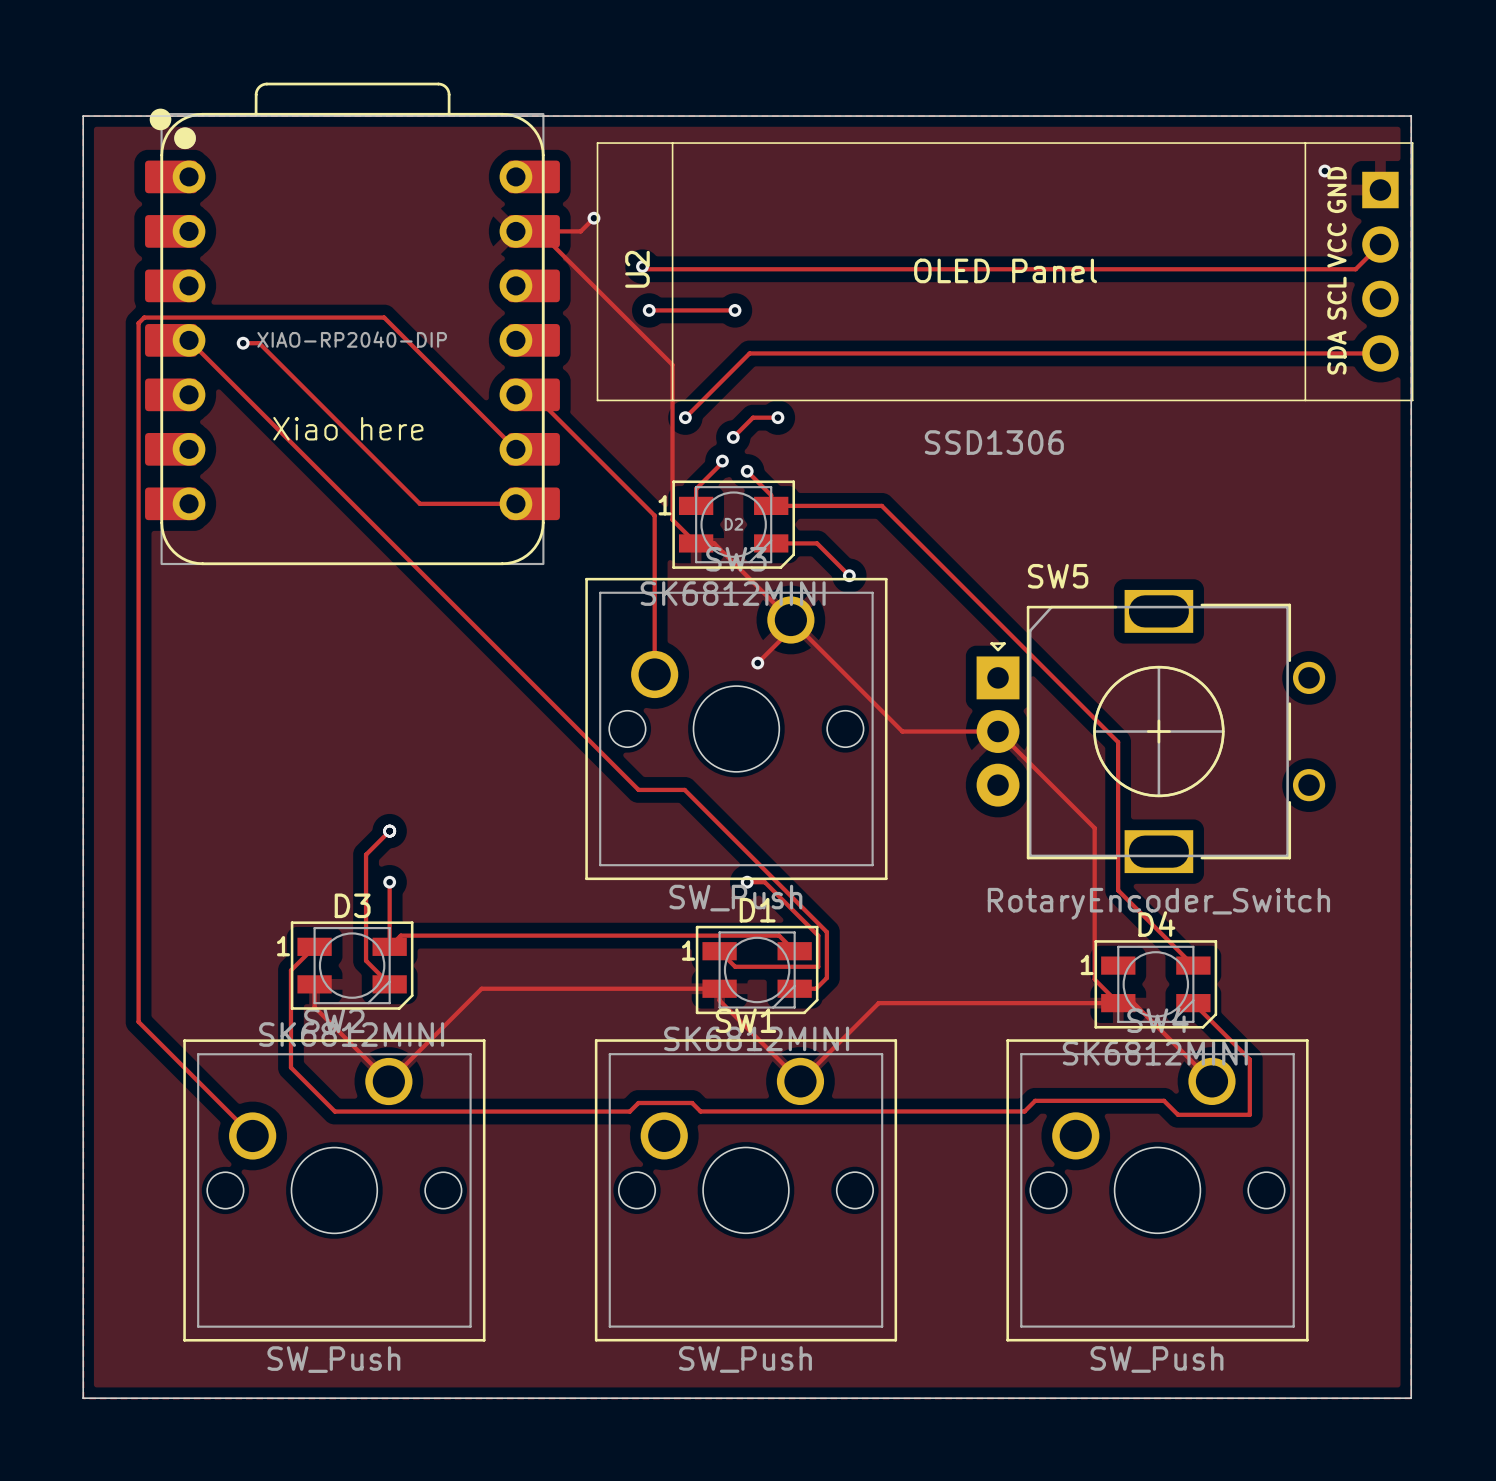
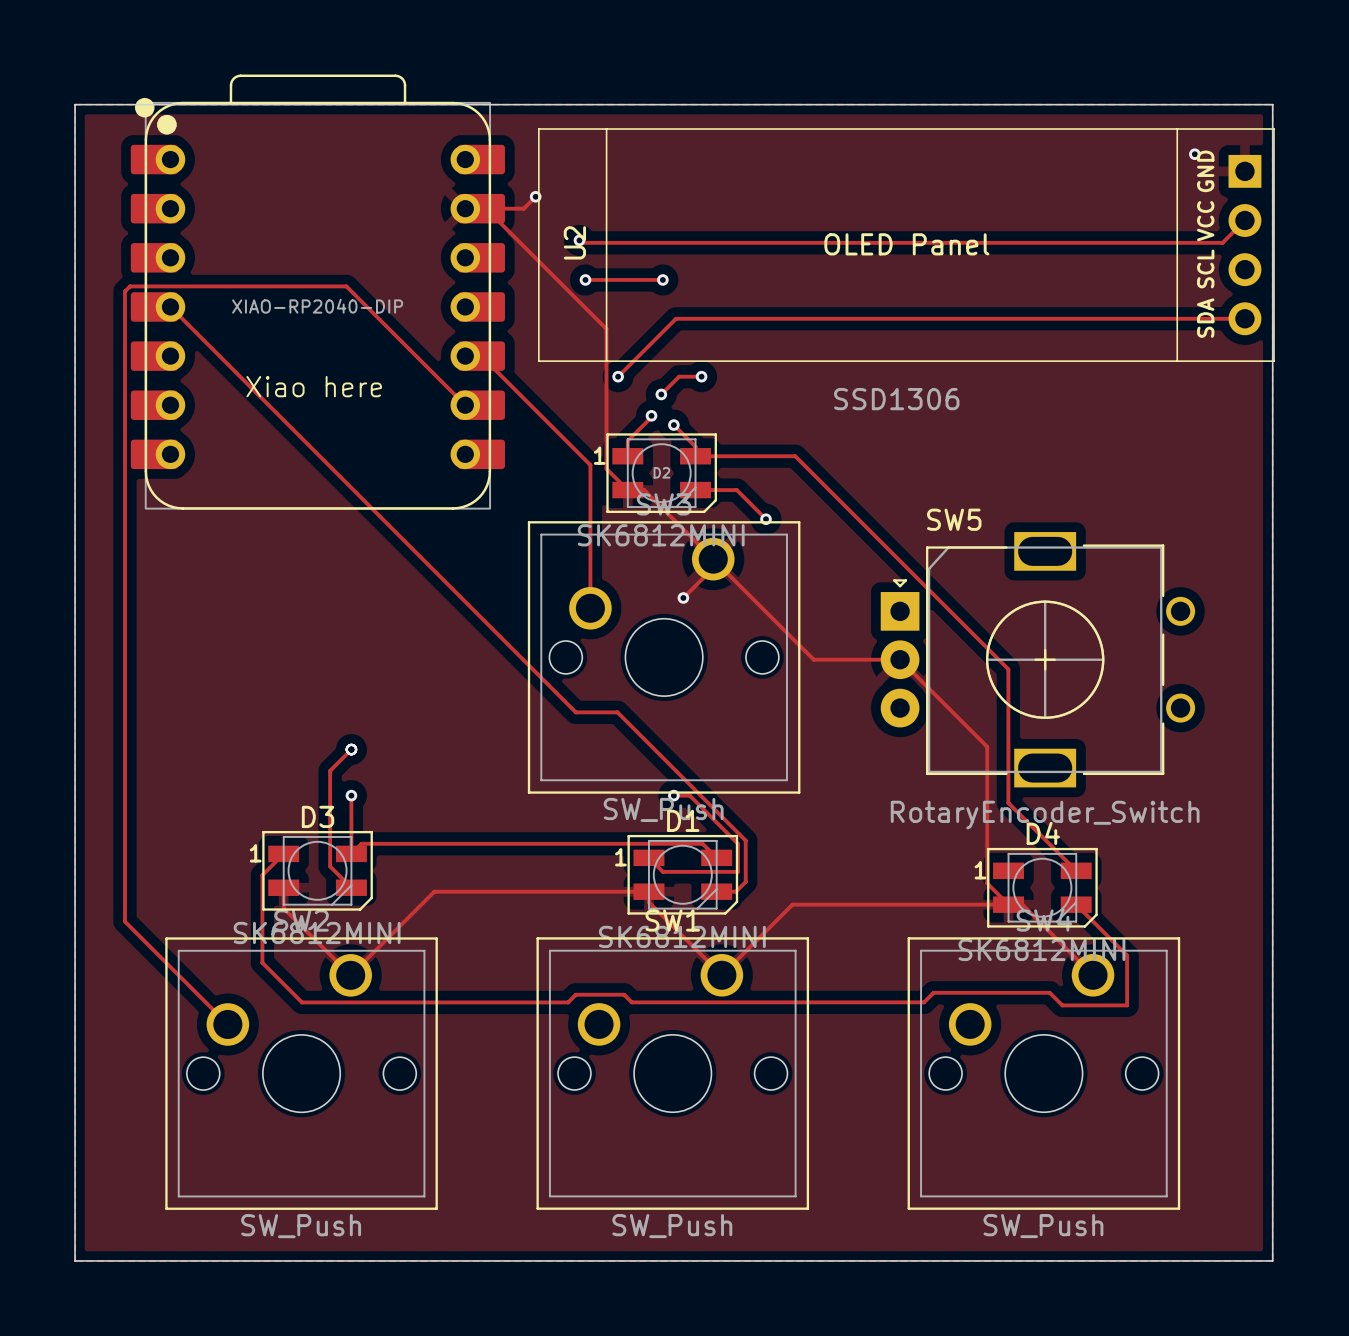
track: (243, 343) (259, 343) (419, 503) (515, 503) -> none
via: (243, 343) -> none

